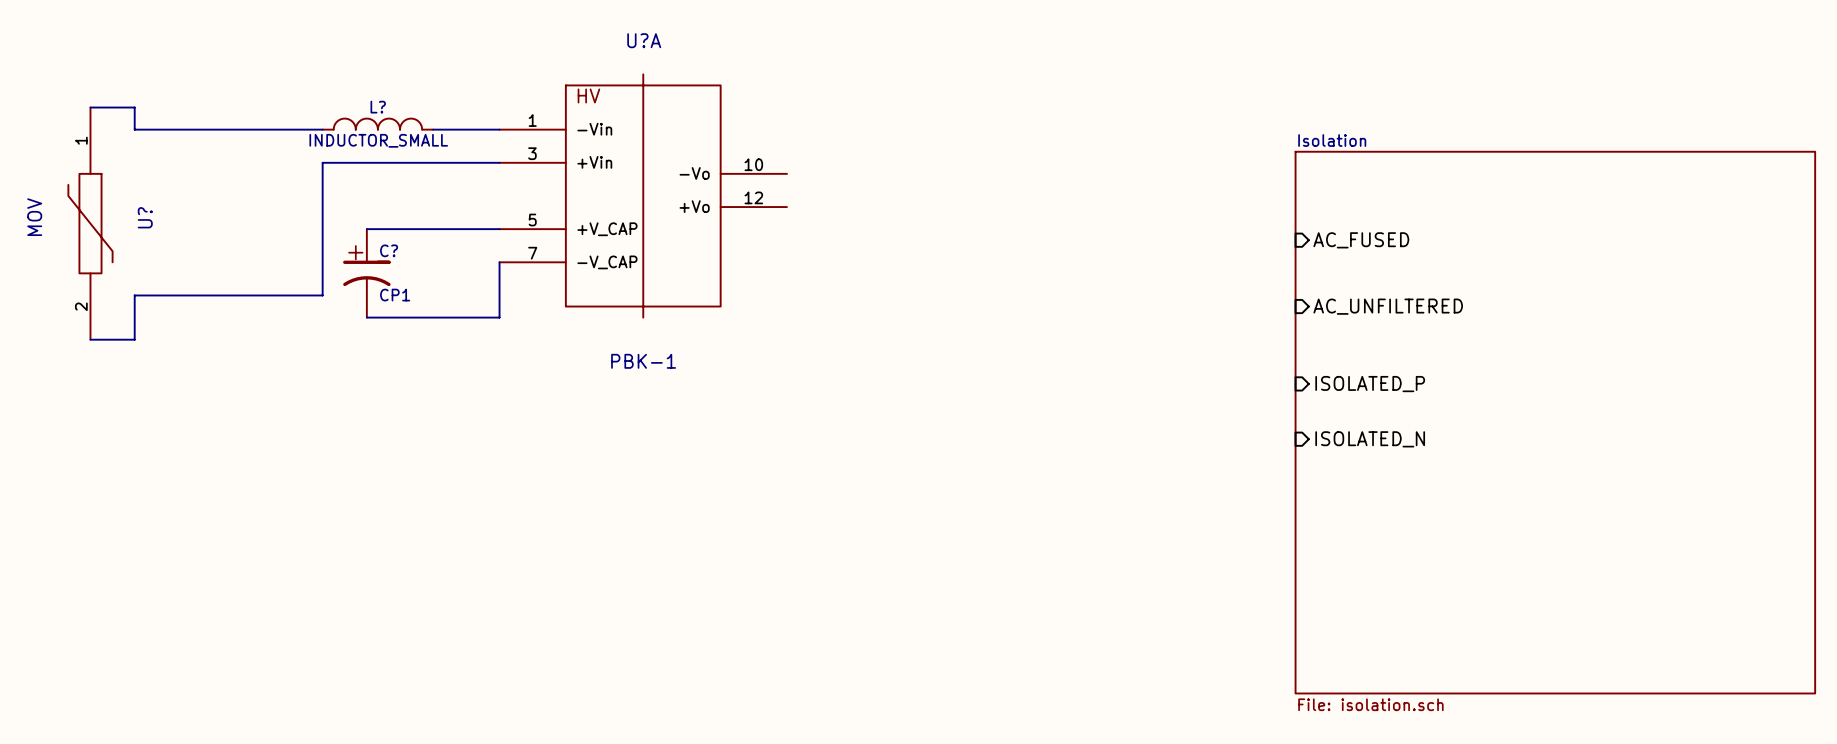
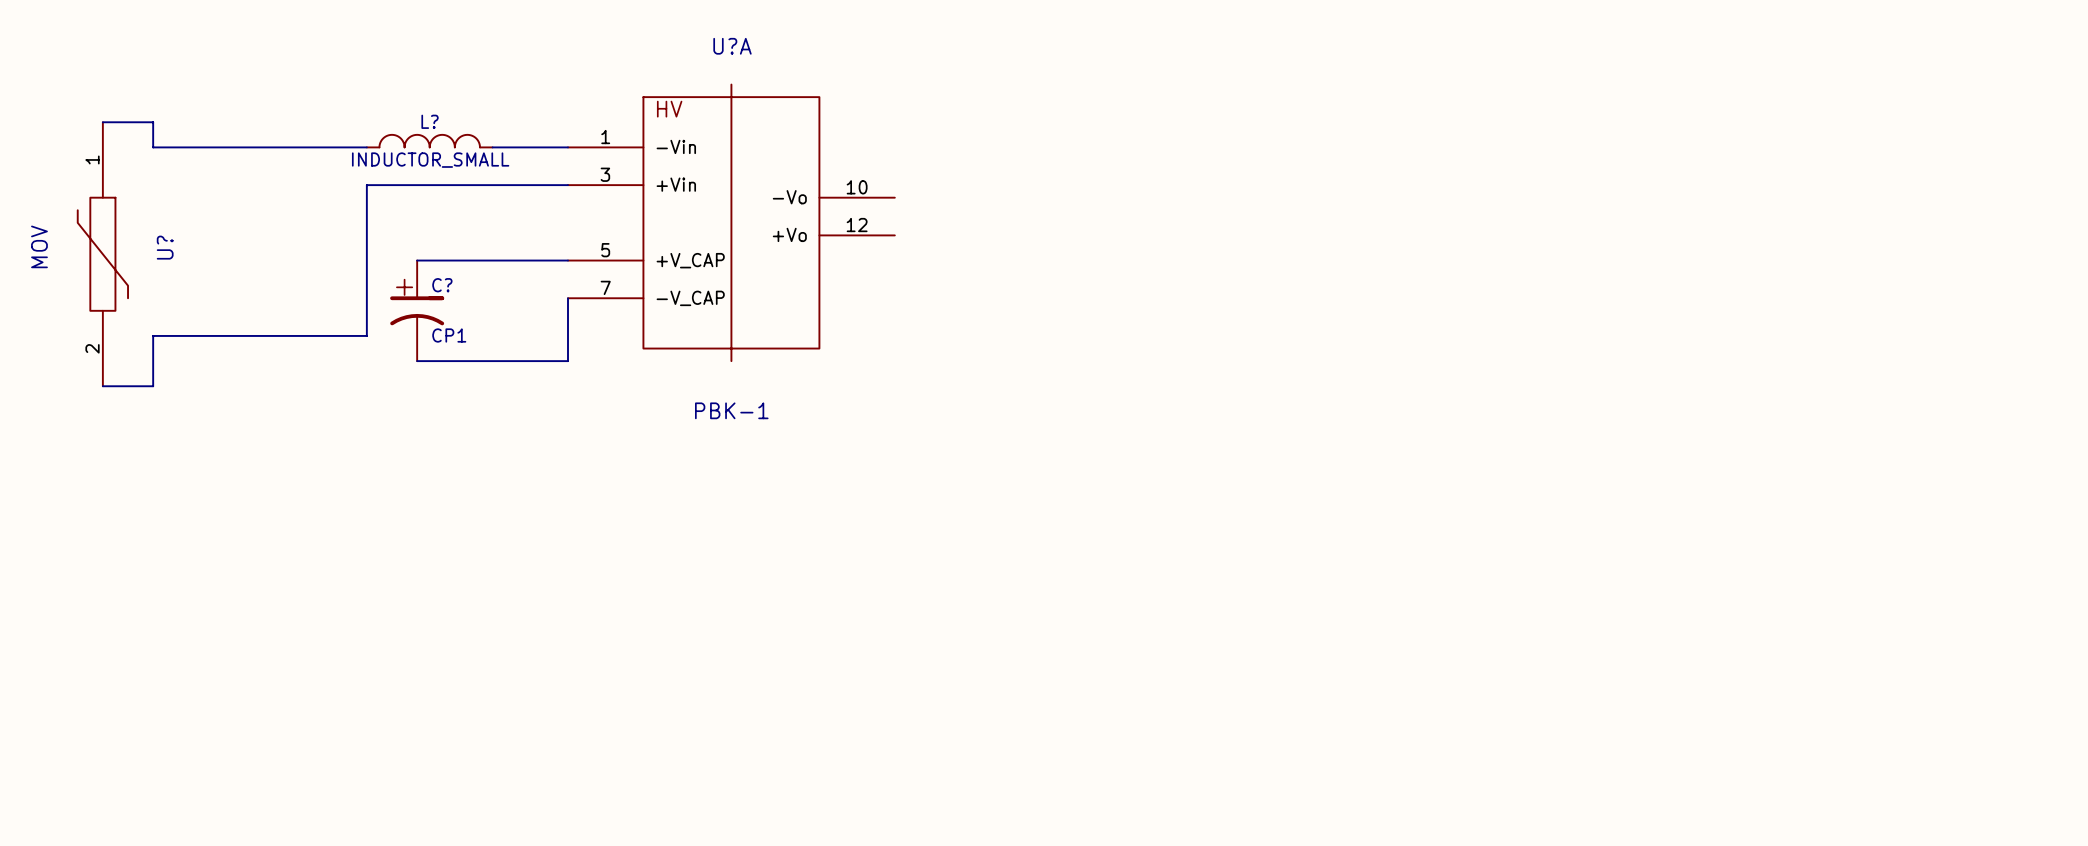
sheet pin: AC_FUSED (1361, 240) -> none
sheet pin: AC_UNFILTERED (1388, 306) -> none
sheet pin: ISOLATED_P (1370, 384) -> none
sheet Isolation: File: isolation.sch (1555, 422) -> none
sheet pin: ISOLATED_N (1370, 439) -> none

